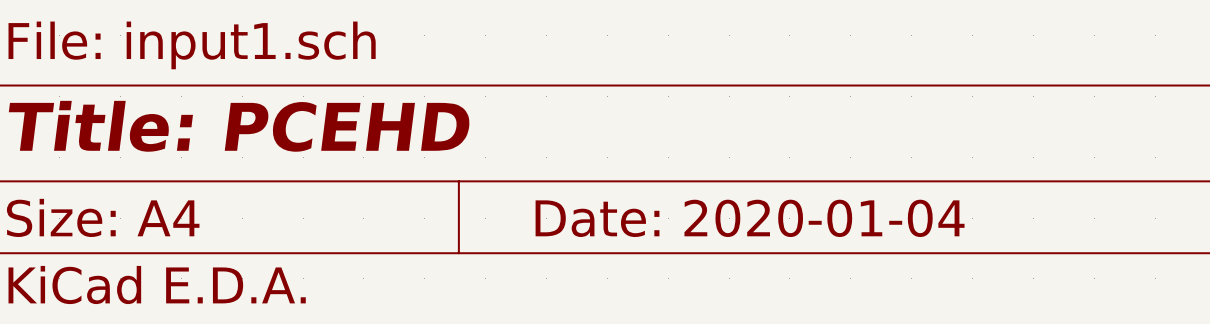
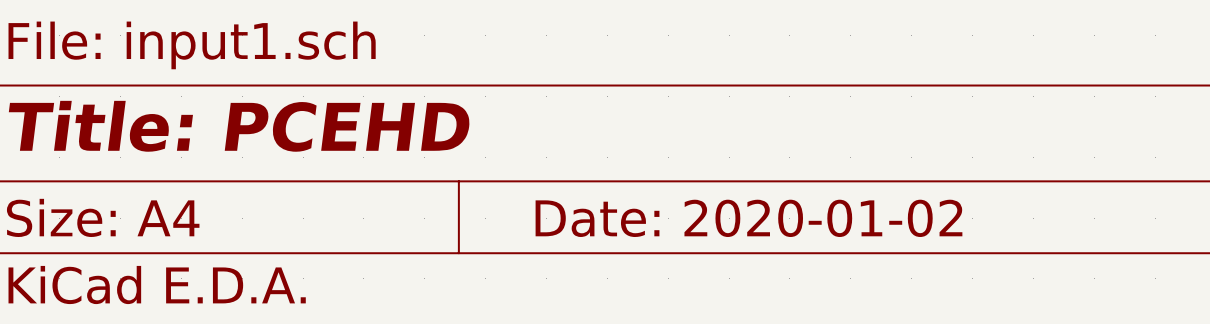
title block: Date: 2020-01-04 (750, 218) -> Date: 2020-01-02 (748, 218)

